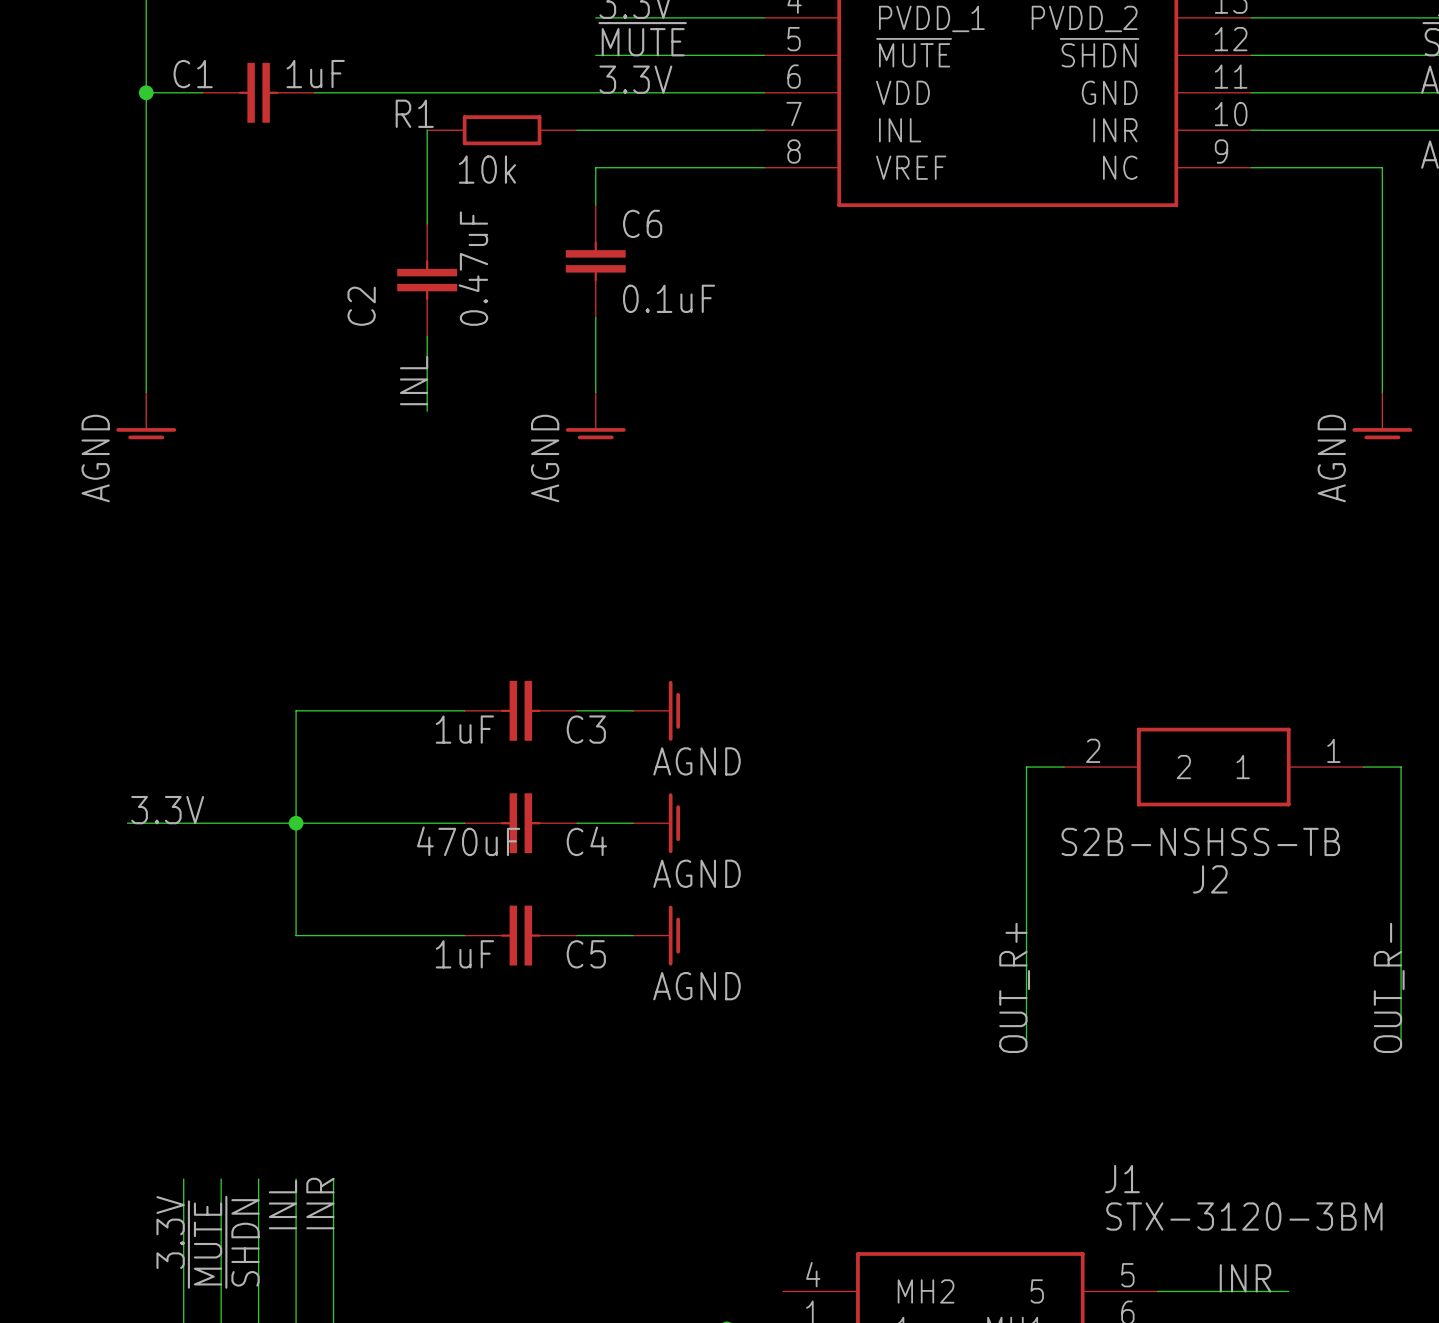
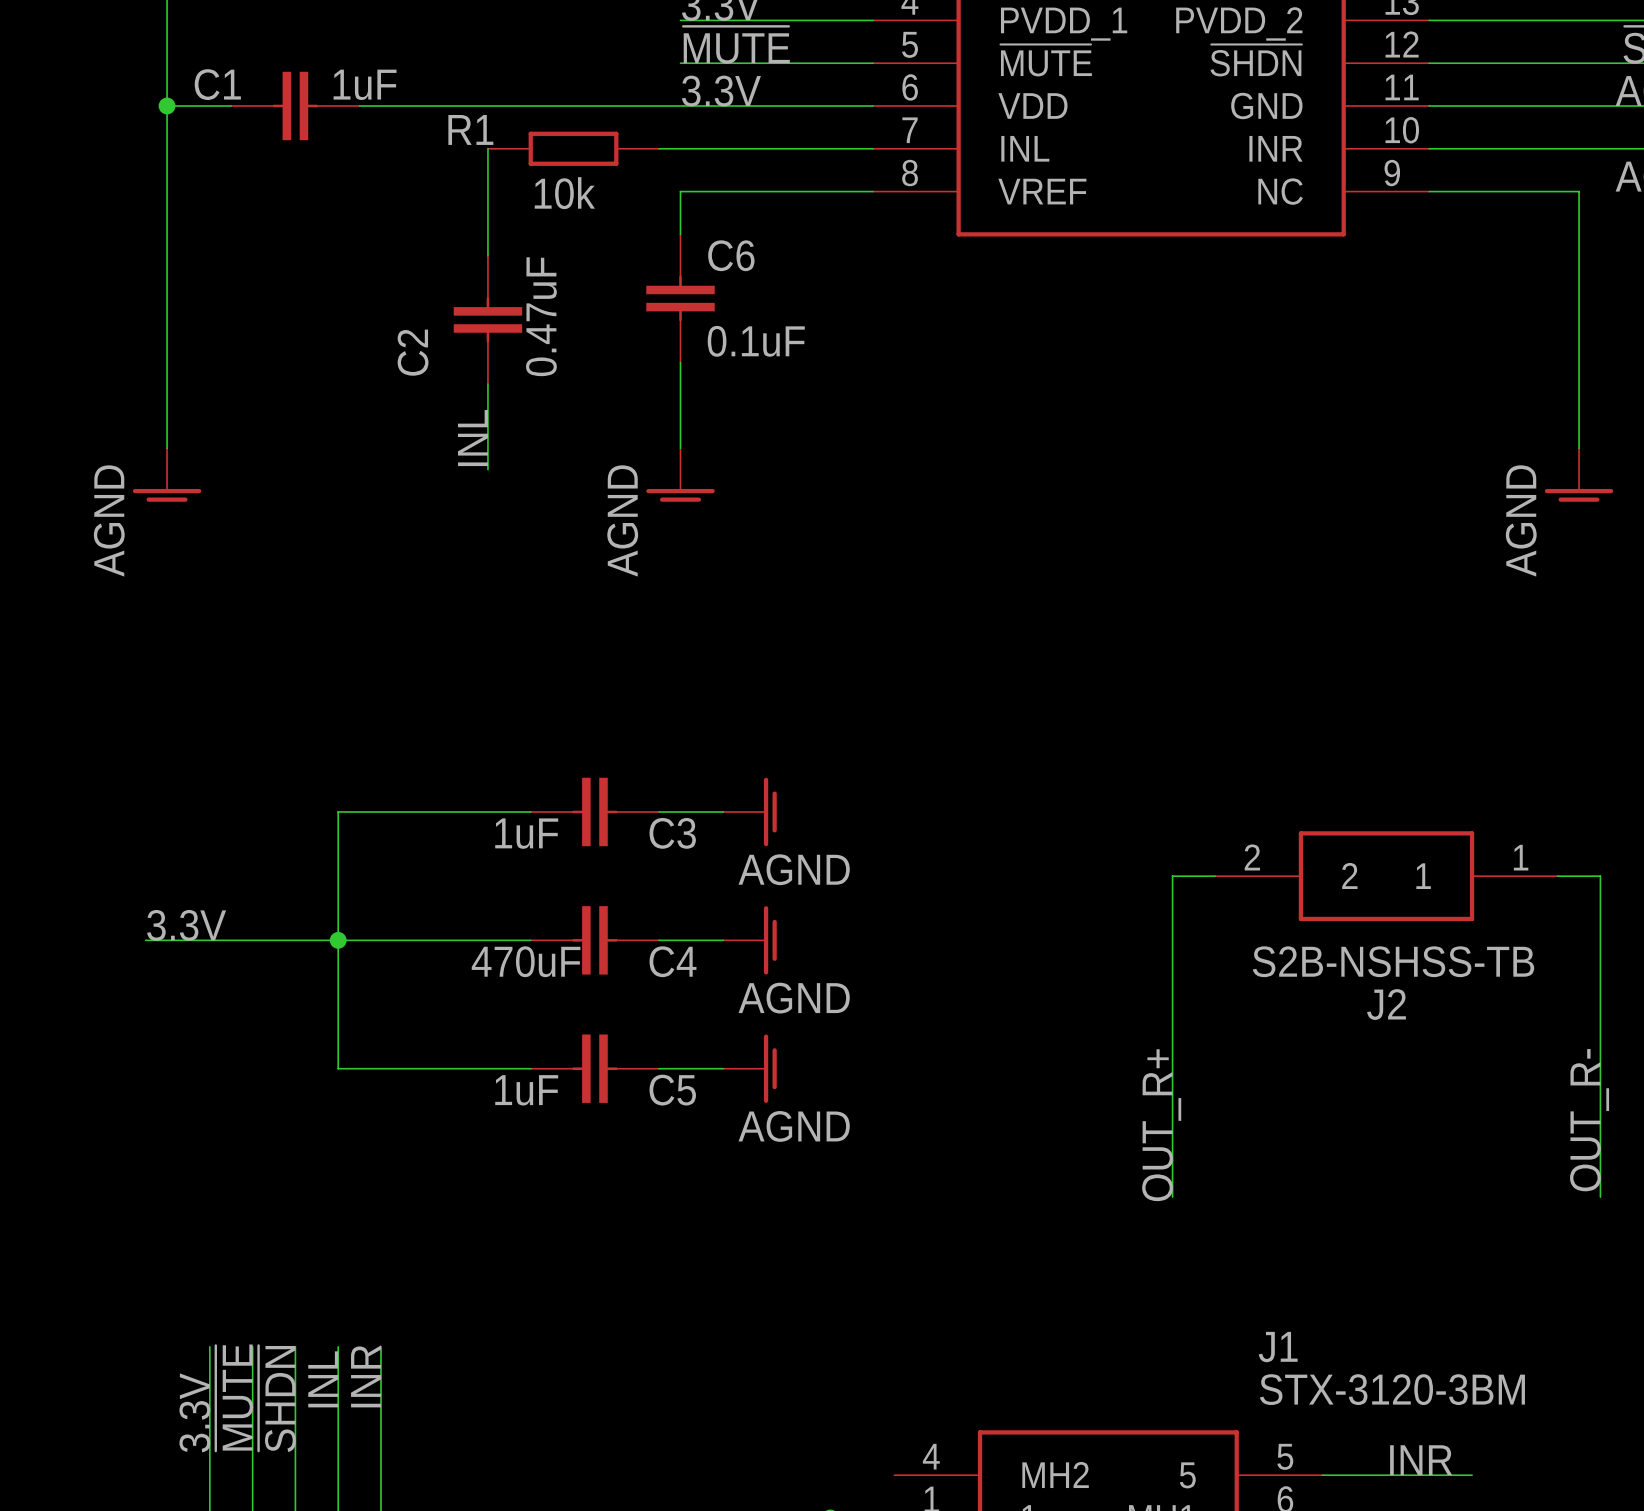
label position: ~{SHDN} (242, 1242) -> ~{SHDN} (277, 1398)
label position: ~{MUTE} (205, 1244) -> ~{MUTE} (234, 1397)

